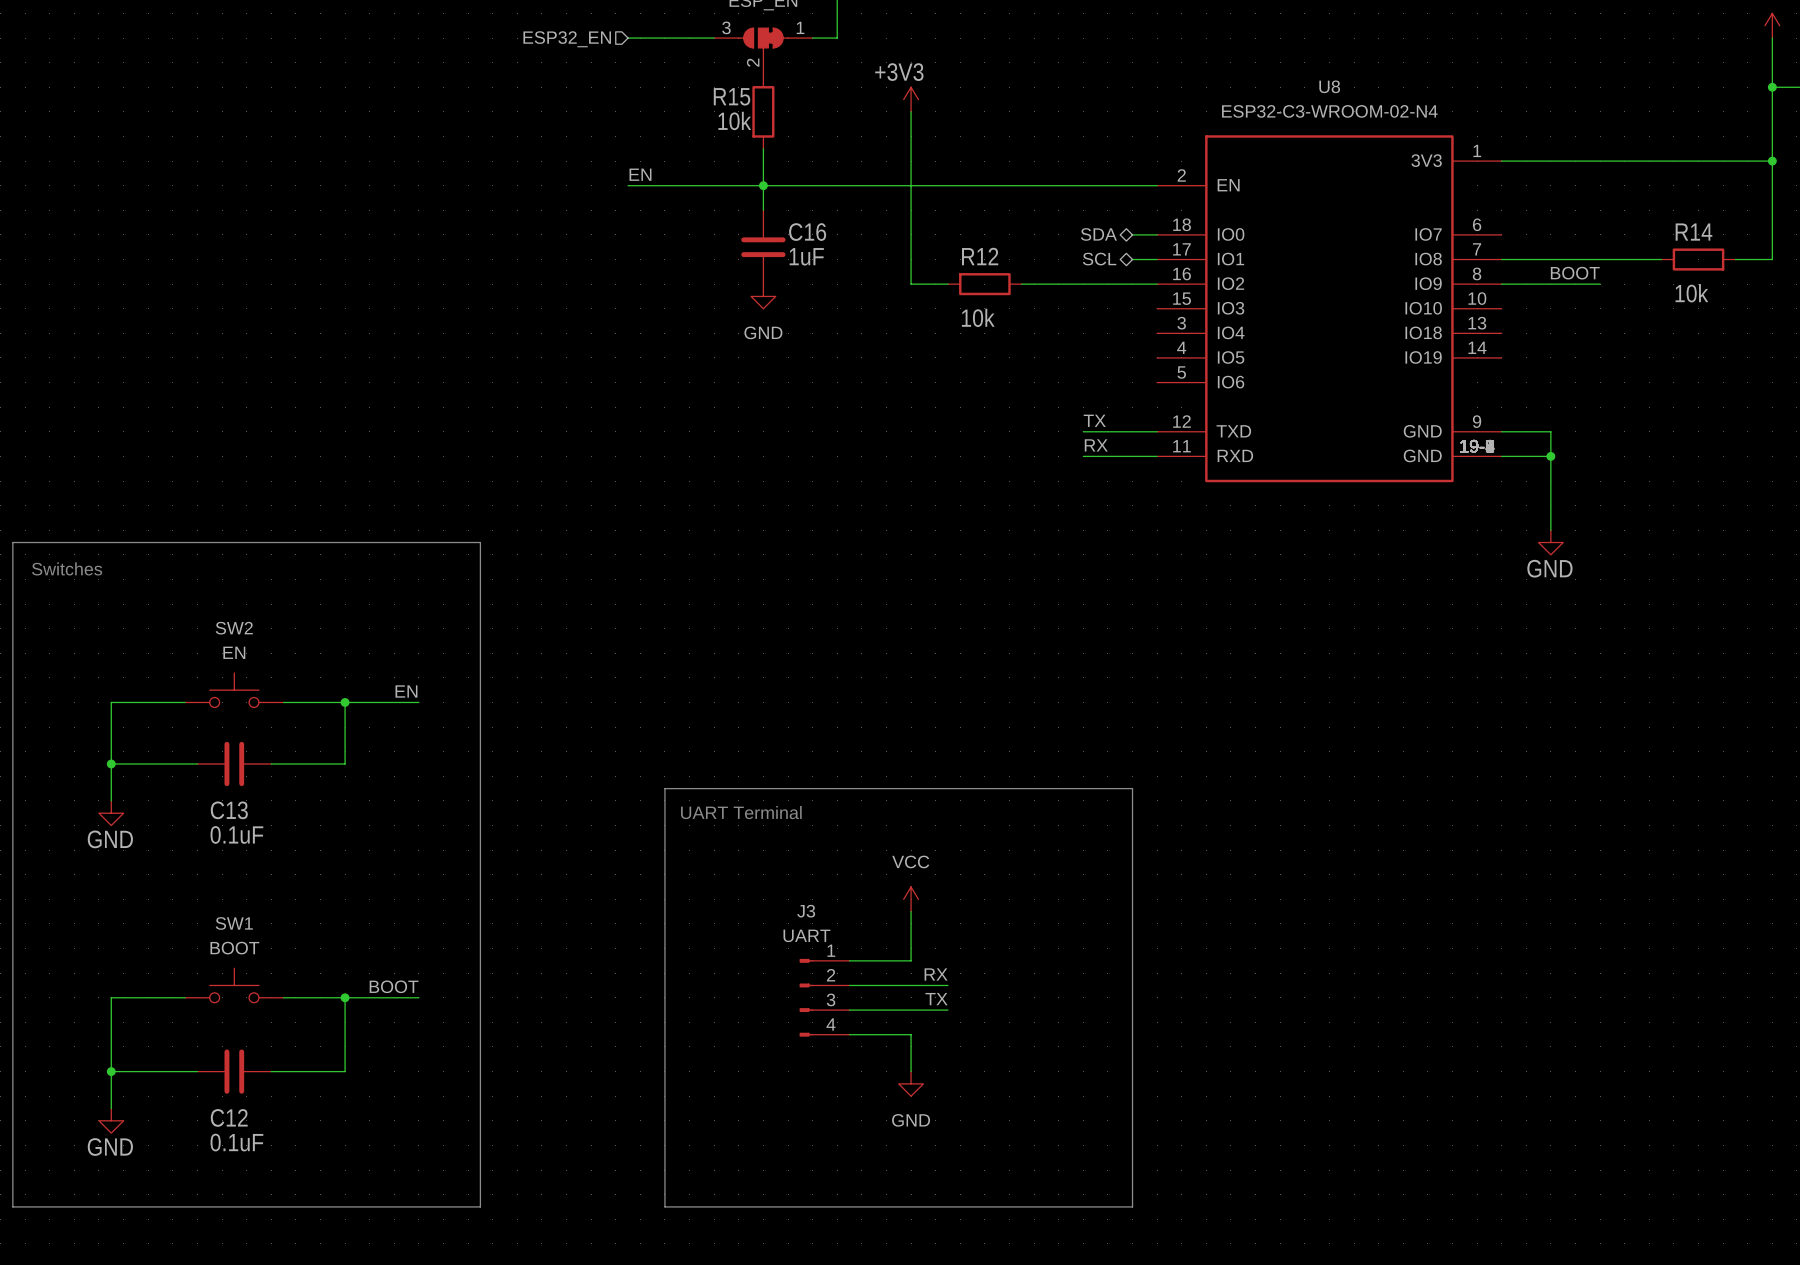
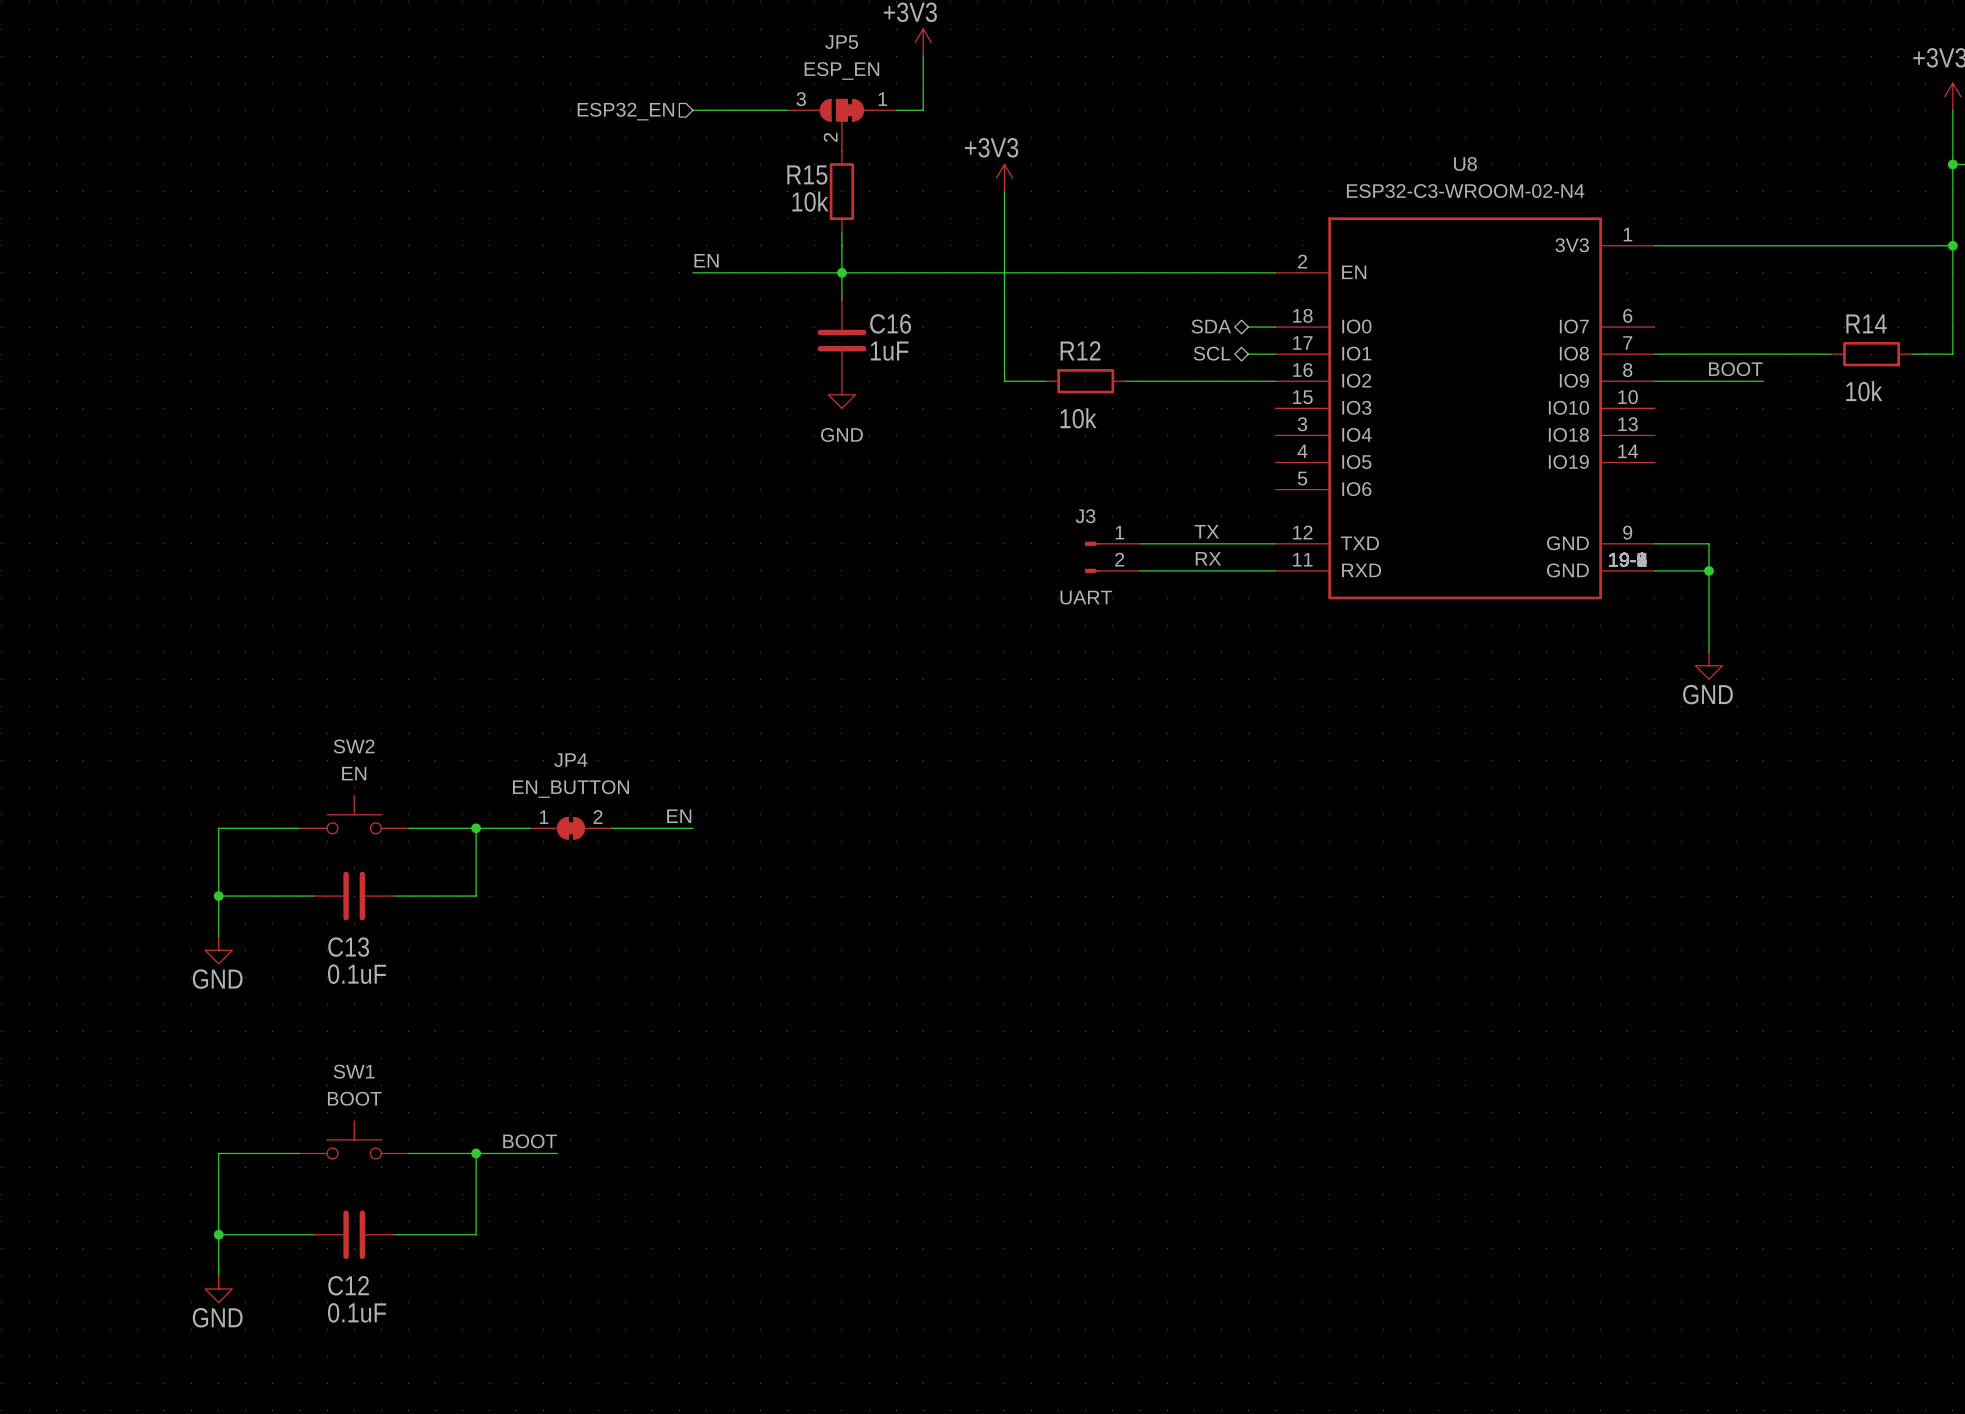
wire: none -> (1139, 543) (1194, 543)
wire: none -> (1139, 570) (1194, 570)
line: (12, 542) (480, 542) (480, 1206) (12, 1206) (12, 542) -> none
text: Switches (67, 568) -> none
SW2 position: (234, 690) -> (354, 814)
wire: none -> (408, 828) (530, 828)
junction: none -> (476, 828)
JP4: none -> EN_BUTTON (570, 828)
wire: none -> (611, 828) (692, 828)
label position: EN (406, 691) -> EN (679, 816)
wire: (185, 702) (111, 702) (111, 800) -> (300, 828) (218, 828) (218, 936)
wire: (283, 702) (418, 702) -> none
wire: (345, 702) (345, 763) (271, 763) -> (476, 828) (476, 896) (394, 896)
junction: (345, 702) -> none
junction: none -> (218, 896)
wire: (111, 763) (197, 763) -> (218, 896) (313, 896)
junction: (111, 763) -> none
C13 position: (234, 763) -> (354, 896)
line: (664, 788) (1132, 788) (1132, 1206) (664, 1206) (664, 788) -> none
text: UART Terminal (741, 812) -> none
power symbol position: GND (111, 813) -> GND (218, 950)
power symbol: VCC (911, 899) -> none
J3 name position: J3 (806, 911) -> J3 (1085, 516)
wire: (911, 911) (911, 960) (849, 960) -> none
J3 value position: UART (806, 935) -> UART (1086, 597)
J3 symbol: [799, 958, 850, 1037] -> [1084, 541, 1140, 574]
label: RX (936, 974) -> none
SW1 position: (234, 985) -> (354, 1139)
junction: none -> (476, 1153)
wire: (849, 985) (947, 985) -> none
label position: BOOT (394, 986) -> BOOT (530, 1141)
wire: (185, 997) (111, 997) (111, 1108) -> (300, 1153) (218, 1153) (218, 1275)
wire: (283, 997) (418, 997) -> (408, 1153) (557, 1153)
wire: (345, 997) (345, 1071) (271, 1071) -> (476, 1153) (476, 1234) (394, 1234)
junction: (345, 997) -> none
label: TX (936, 999) -> none
wire: (849, 1010) (947, 1010) -> none
wire: (849, 1034) (911, 1034) (911, 1071) -> none
junction: none -> (218, 1234)
wire: (111, 1071) (197, 1071) -> (218, 1234) (313, 1234)
junction: (111, 1071) -> none
C12 position: (234, 1071) -> (354, 1234)
power symbol: GND (911, 1083) -> none
power symbol position: GND (111, 1120) -> GND (218, 1288)

